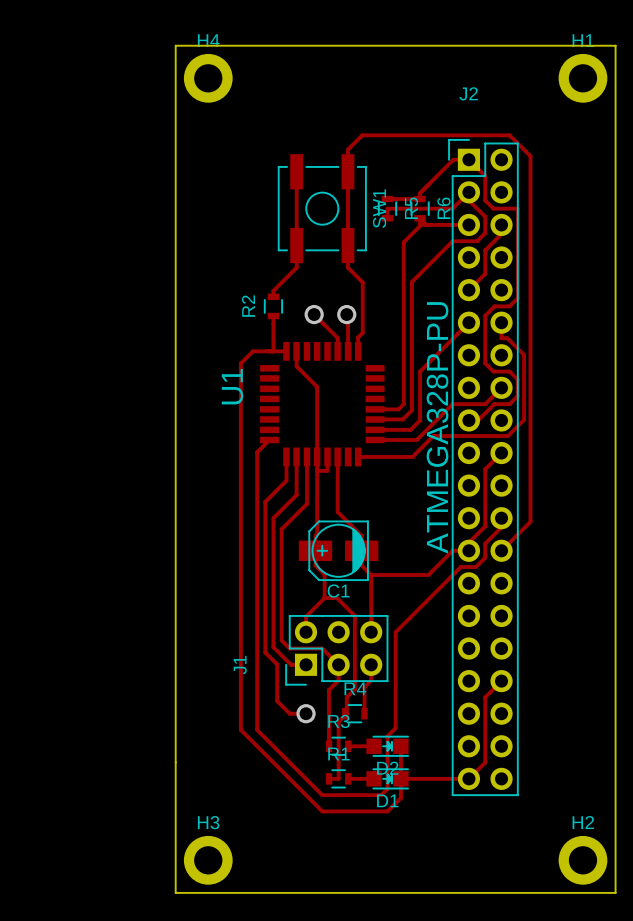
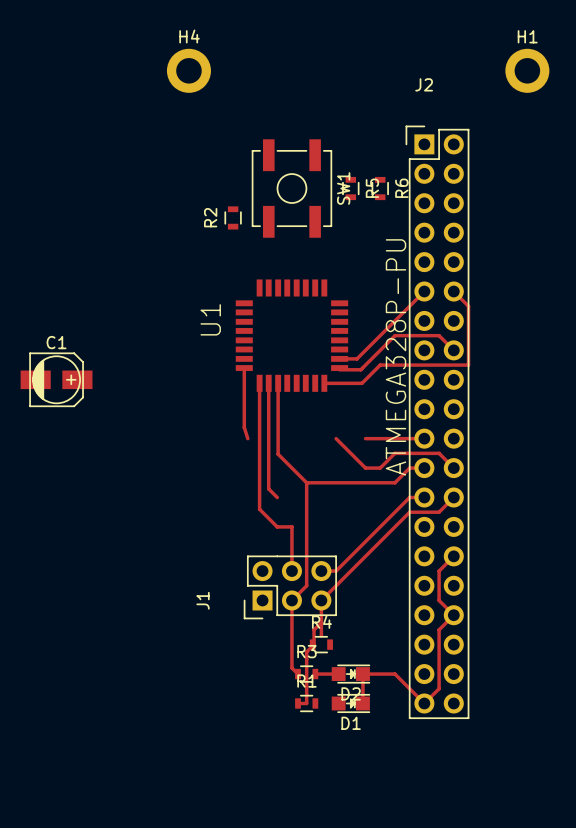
board edge: (175, 45) (175, 892) (615, 892) (615, 45) (175, 45) -> none
track: (296, 171) (296, 267) (273, 290) (273, 296) -> none
track: (387, 199) (420, 199) (420, 193) (453, 159) (468, 159) (485, 176) (485, 200) (493, 208) (517, 208) (517, 298) (509, 306) (494, 306) (485, 315) (485, 363) (493, 371) (509, 371) (517, 379) (517, 396) (509, 404) -> none
track: (387, 218) (387, 208) (452, 208) (468, 192) (467, 200) (485, 216) (485, 233) (477, 241) (452, 241) (411, 281) (411, 410) (402, 419) (375, 419) -> none
track: (420, 224) (468, 224) -> none
track: (426, 224) (420, 218) (420, 225) (403, 242) (403, 404) -> (453, 350) (439, 335) (394, 335) (365, 365)
track: (501, 224) (501, 234) (485, 250) (485, 273) (468, 290) -> none
R2 position: (273, 306) -> (233, 217)
track: (314, 314) (337, 338) (337, 351) -> none
via: (314, 314) -> none
track: (346, 314) (348, 351) -> none
via: (346, 314) -> none
track: (273, 316) (273, 351) -> none
track: (501, 322) (501, 338) (507, 338) (524, 354) (524, 419) (507, 436) (433, 436) (412, 456) (358, 456) -> (453, 291) (468, 306) (468, 365) (461, 365)
track: (286, 351) (252, 351) (240, 363) (240, 729) (322, 811) (387, 811) (400, 797) (400, 778) -> none
track: (296, 351) (296, 366) (317, 386) (315, 565) (324, 574) (324, 598) -> none
track: (358, 351) (358, 337) (362, 332) (362, 282) (347, 267) (347, 149) (362, 135) (509, 135) (530, 156) (530, 521) (501, 550) -> none
track: (420, 371) (420, 420) (410, 429) (375, 429) -> (380, 335) (356, 358) (339, 358)
track: (501, 387) (485, 404) -> (447, 365) (439, 365)
U1 position: (322, 404) -> (291, 335)
track: (452, 404) (416, 439) (375, 439) -> (409, 365) (380, 365) (362, 383) (324, 383)
track: (494, 404) (478, 420) (468, 420) -> none
track: none -> (244, 368) (244, 427) (247, 438)
track: none -> (259, 383) (259, 412)
track: none -> (268, 383) (268, 412)
track: none -> (278, 383) (278, 412)
track: (269, 439) (257, 452) (257, 729) (322, 795) (381, 795) (387, 788) (387, 736) (395, 728) (395, 632) (460, 567) -> none
track: (501, 453) (485, 469) (485, 526) (468, 542) (468, 550) -> none
track: (327, 456) (327, 470) (317, 470) -> none
track: (337, 456) (337, 511) (361, 536) (361, 565) (371, 575) -> none
track: (286, 480) (265, 501) (265, 652) (277, 664) (277, 701) (289, 713) (306, 713) -> (259, 434) (259, 509) (277, 526) (291, 526) (291, 571)
track: none -> (336, 438) (365, 468) (380, 468) (394, 453) (439, 453) (453, 468)
track: none -> (365, 438) (424, 438)
track: (296, 495) (273, 518) (273, 647) (291, 664) (306, 664) -> (268, 447) (268, 488) (277, 497)
track: (307, 502) (281, 529) (281, 640) (289, 648) (322, 648) (338, 664) (338, 680) (328, 690) (328, 746) -> (306, 482) (306, 585) (291, 600) (291, 668) (297, 674)
track: none -> (278, 454) (306, 482)
track: none -> (424, 468) (409, 468) (394, 482) (306, 482)
track: (501, 518) (501, 527) (485, 543) (485, 557) (475, 567) -> (453, 497) (439, 512) (430, 512)
C1 rotation: 0° (338, 550) -> 180° (56, 379)
C1 position: (338, 550) -> (56, 379)
track: (371, 575) (428, 575) -> (321, 571) (336, 571) (387, 519)
track: (371, 575) (371, 632) -> none
track: (324, 598) (337, 598) (354, 615) (354, 664) -> (417, 512) (409, 512) (321, 600)
track: (324, 598) (306, 616) (306, 632) -> none
track: none -> (453, 556) (439, 571) (439, 600) (453, 615)
J1 position: (336, 650) -> (290, 587)
track: (371, 664) (371, 680) (364, 687) (364, 713) -> none
via: (306, 713) -> none
track: (348, 778) (374, 778) -> none
track: (468, 778) (403, 778) (400, 784) -> (424, 703) (394, 674) (362, 674)
H3: (208, 860) -> none
H2: (582, 860) -> none

